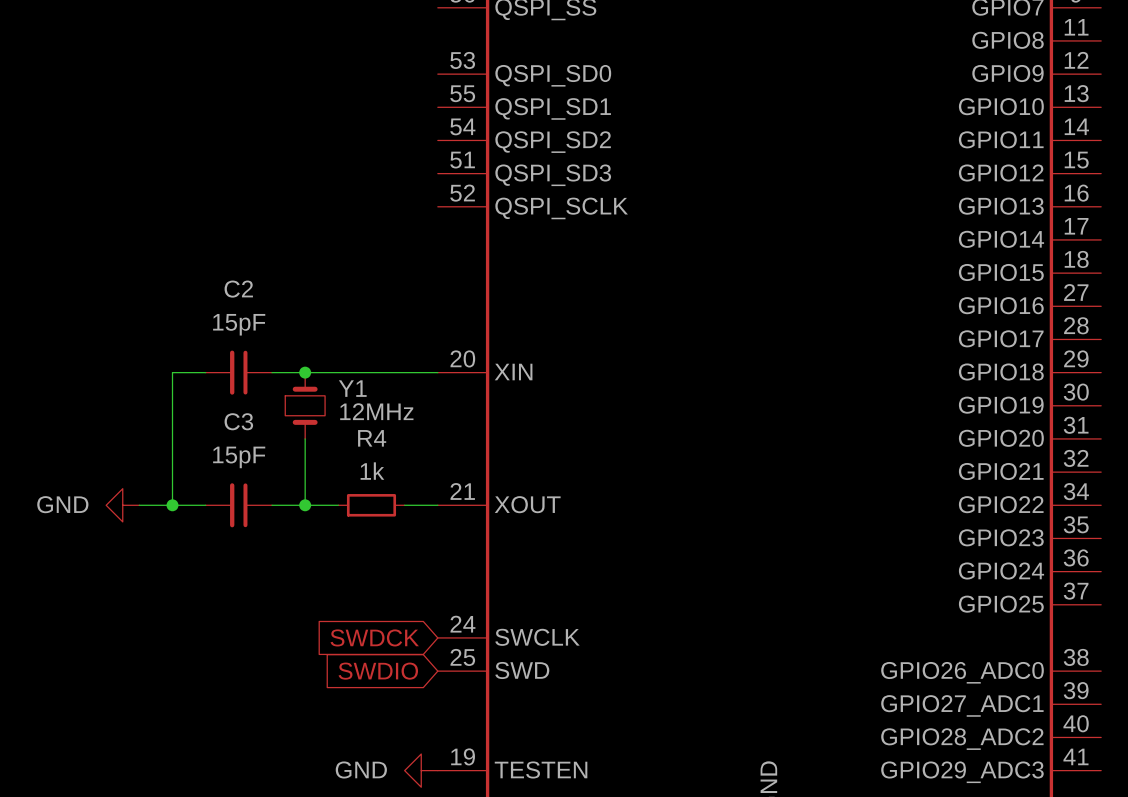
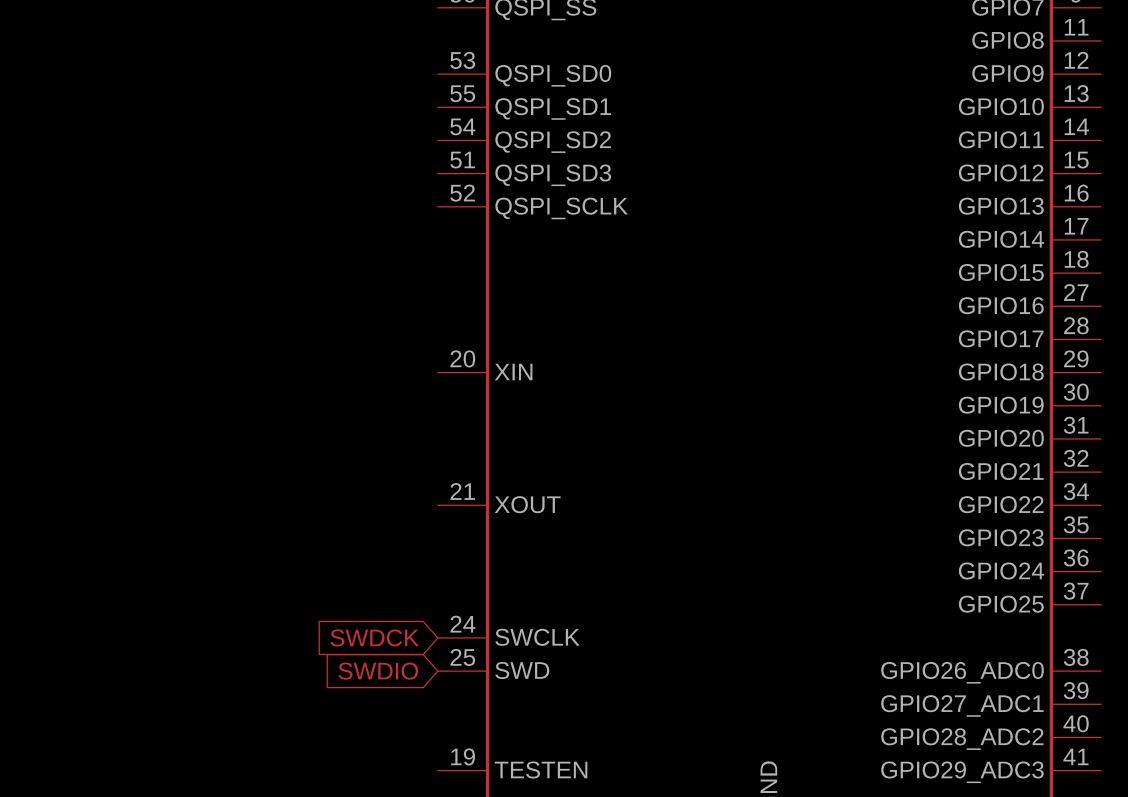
wire: (205, 372) (172, 372) (172, 505) -> none
C2: 15pF (238, 372) -> none
wire: (272, 372) (437, 372) -> none
junction: (305, 372) -> none
Y1: 12MHz (305, 405) -> none
wire: (305, 438) (305, 505) -> none
power symbol: GND (122, 505) -> none
wire: (139, 505) (205, 505) -> none
junction: (172, 505) -> none
C3: 15pF (238, 505) -> none
wire: (272, 505) (338, 505) -> none
junction: (305, 505) -> none
R4: 1k (371, 505) -> none
wire: (404, 505) (437, 505) -> none
power symbol: GND (421, 770) -> none

